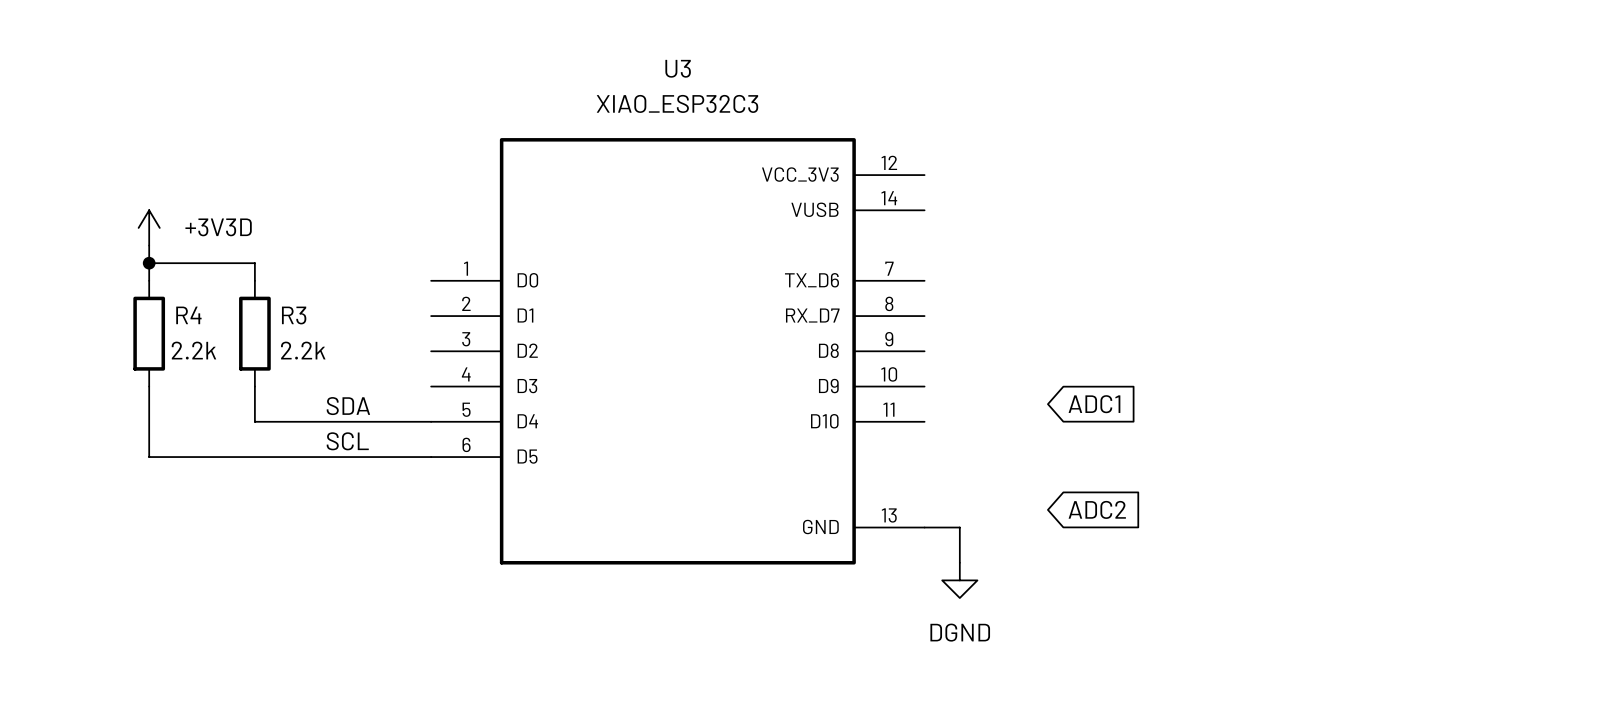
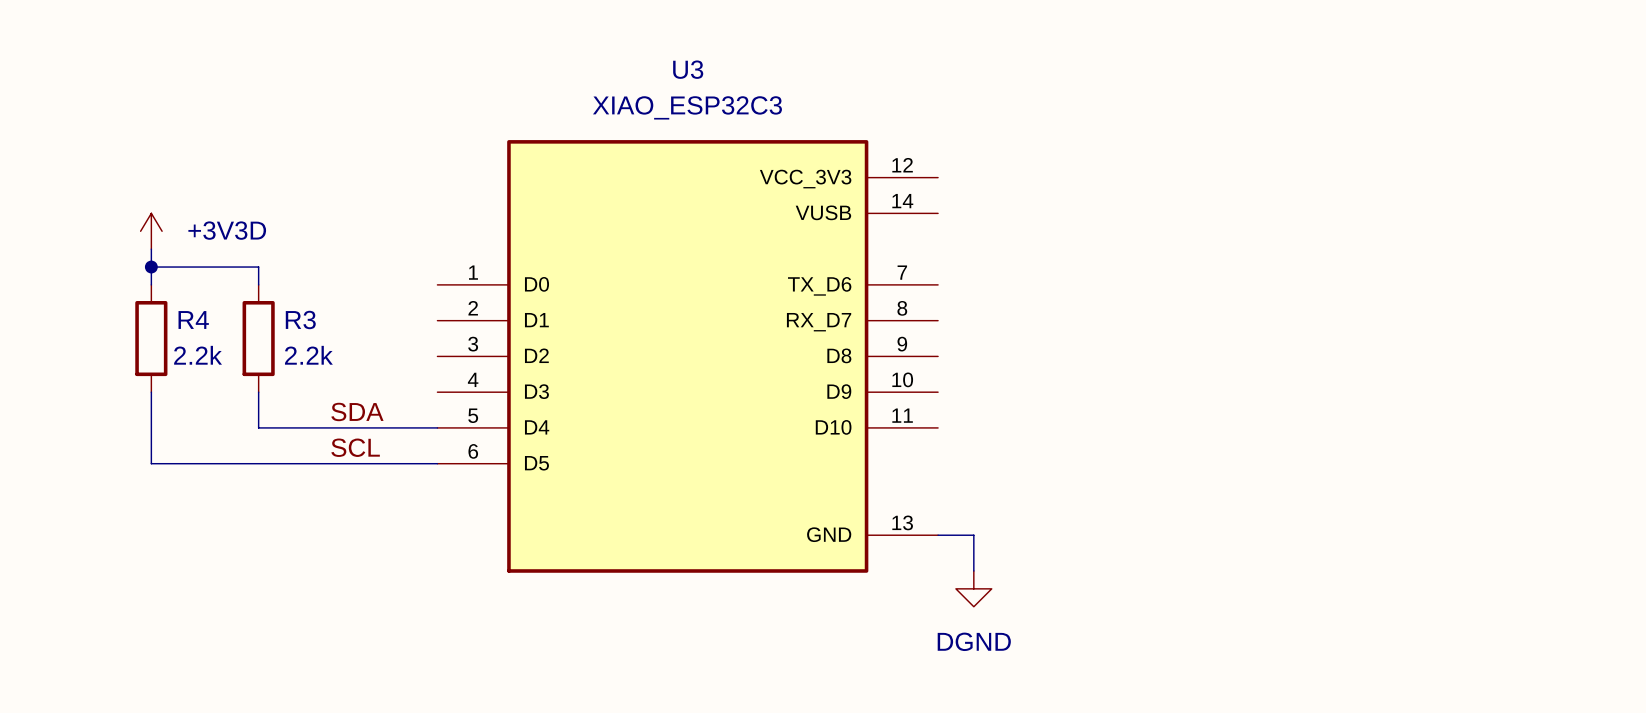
global label: ADC1 (1094, 404) -> none
global label: ADC2 (1097, 509) -> none

